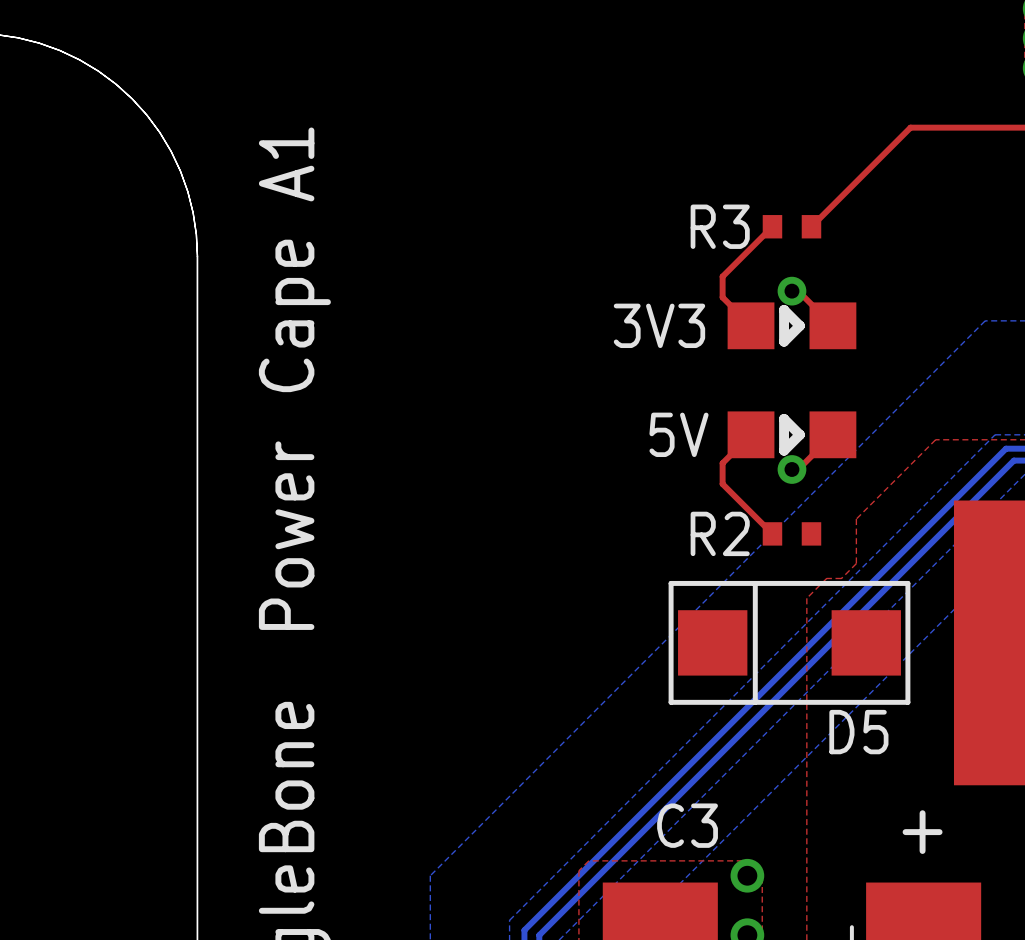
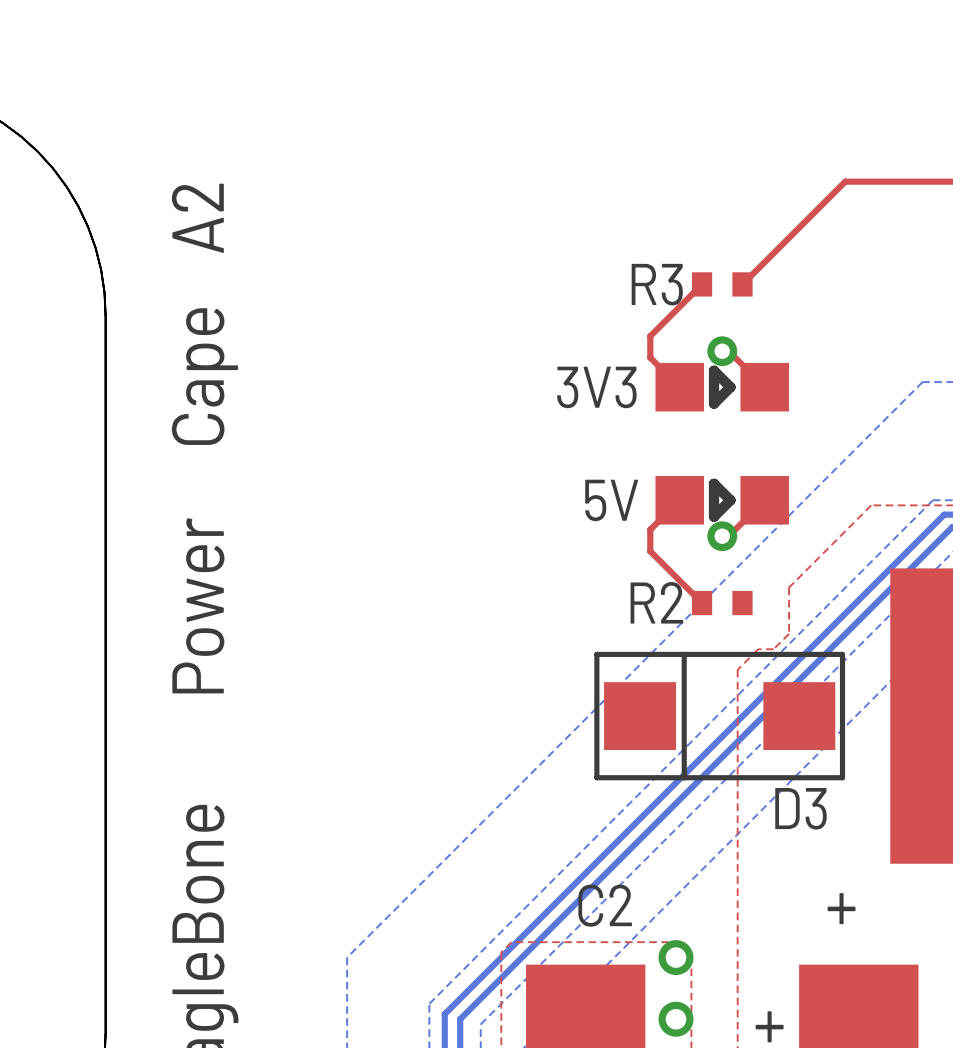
text: A1 (286, 164) -> A2 (197, 218)
D5 name: D5 (858, 732) -> D3 (800, 808)
C3 name: C3 (687, 825) -> C2 (605, 905)

